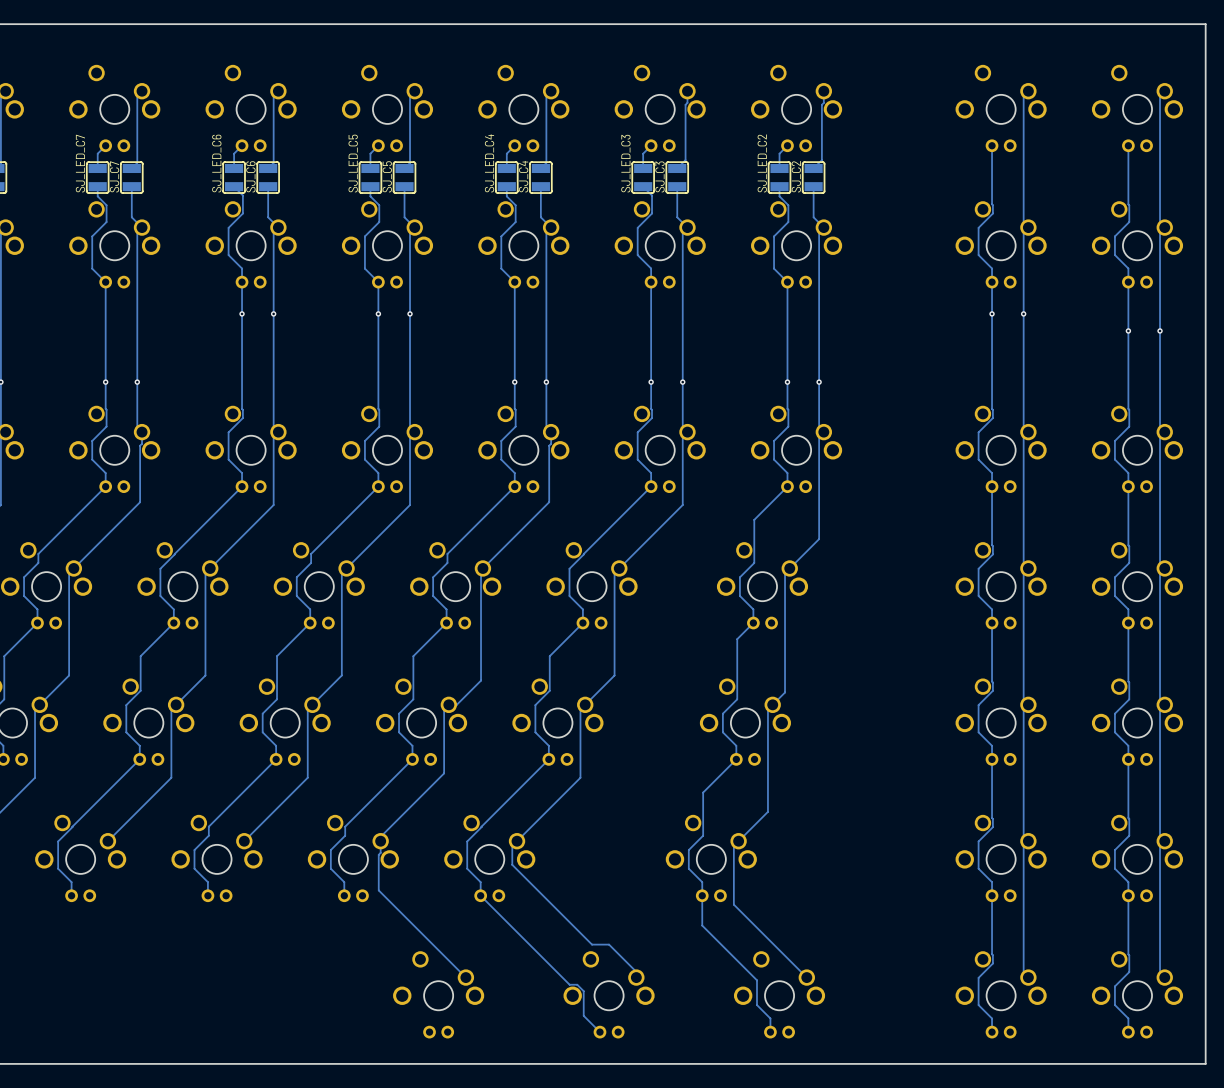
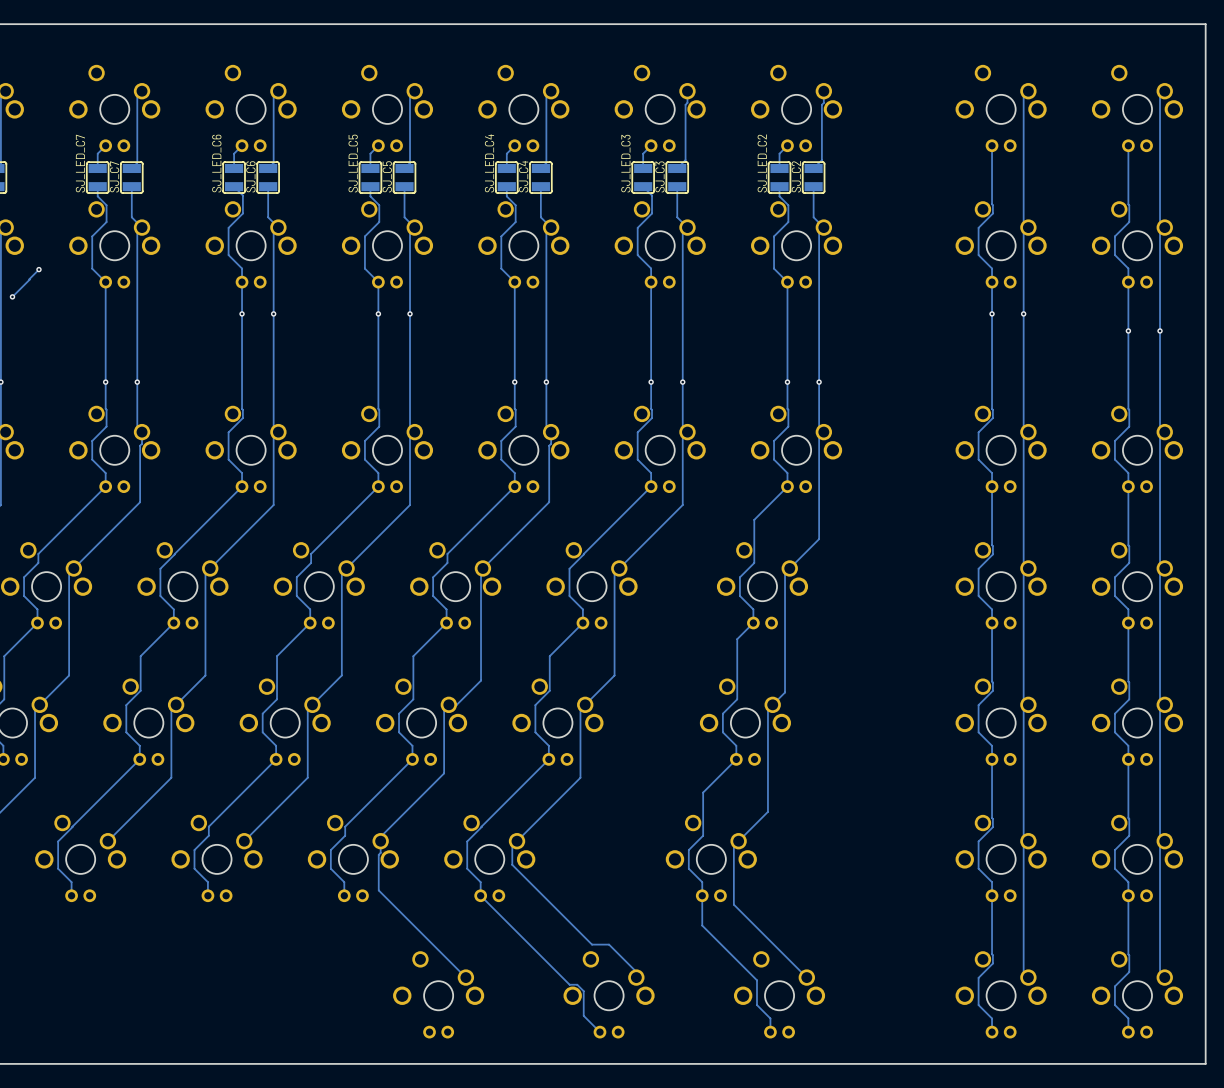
track: none -> (38, 269) (12, 296)
via: none -> (38, 269)
via: none -> (12, 296)

